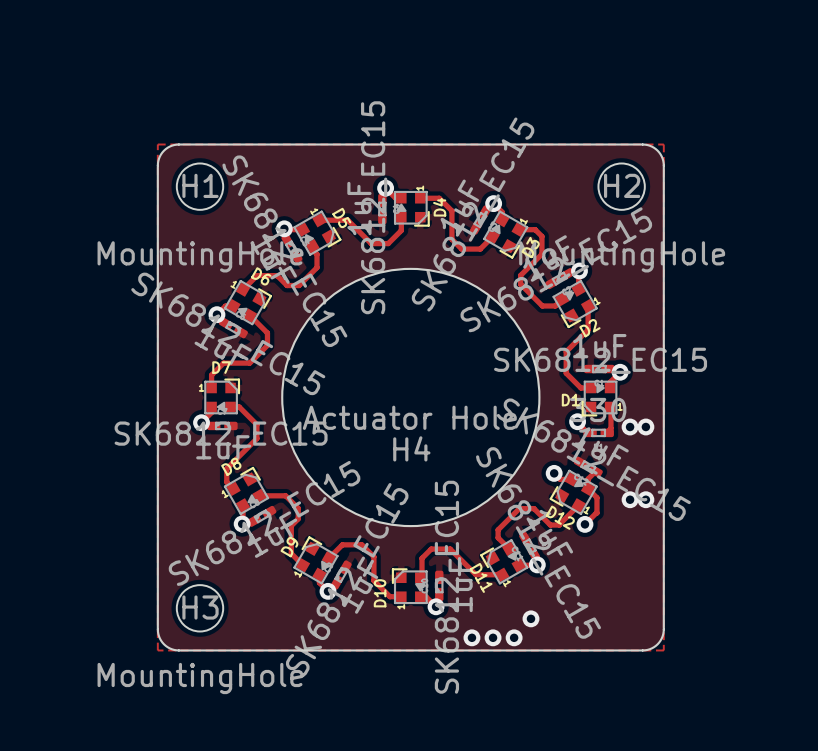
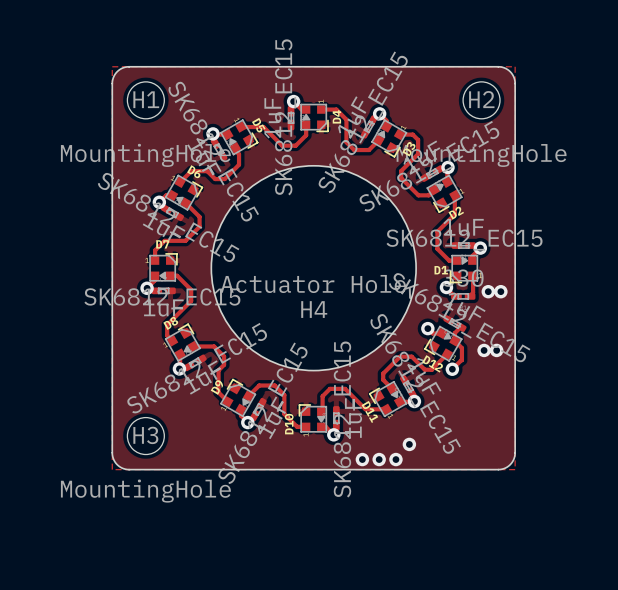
via: (630, 499) -> none
via: (645, 499) -> none
via: none -> (484, 350)
via: none -> (496, 350)

